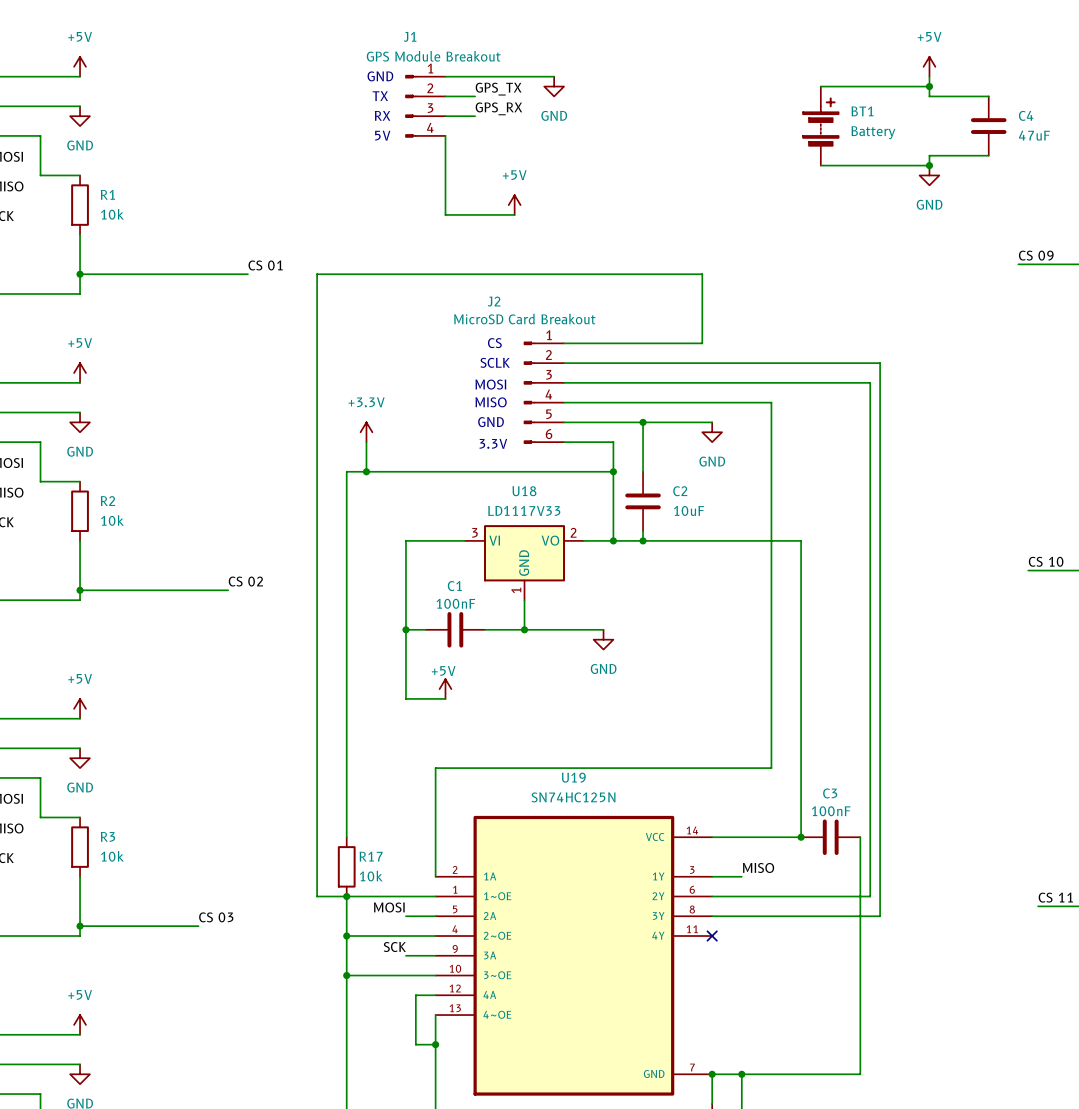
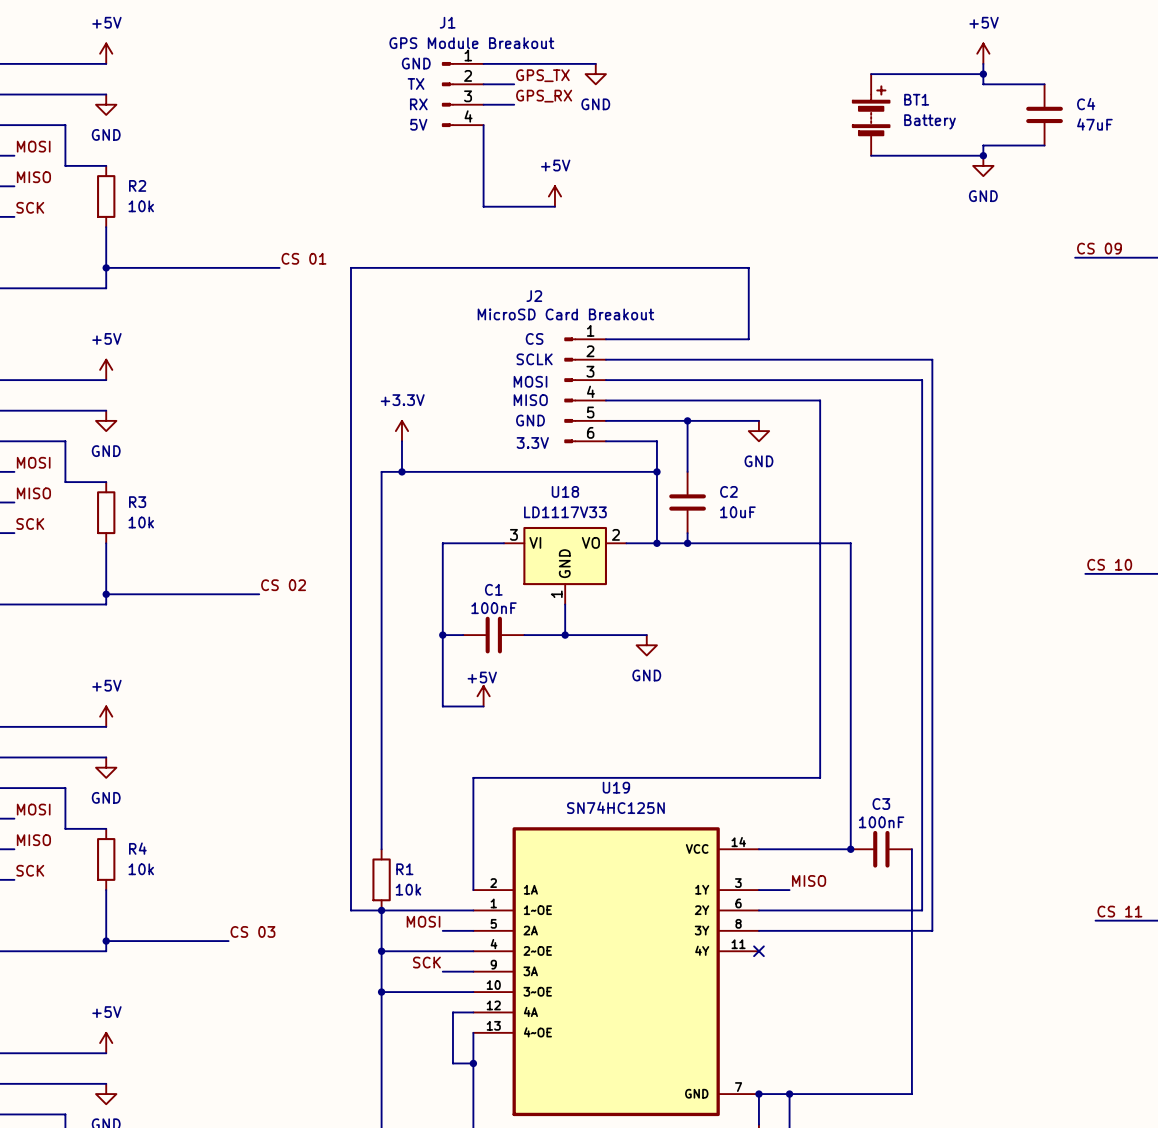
R1 name: R1 (107, 194) -> R2 (137, 185)
R2 name: R2 (107, 501) -> R3 (137, 502)
R3 name: R3 (107, 836) -> R4 (137, 848)
R17 name: R17 (371, 856) -> R1 (404, 869)

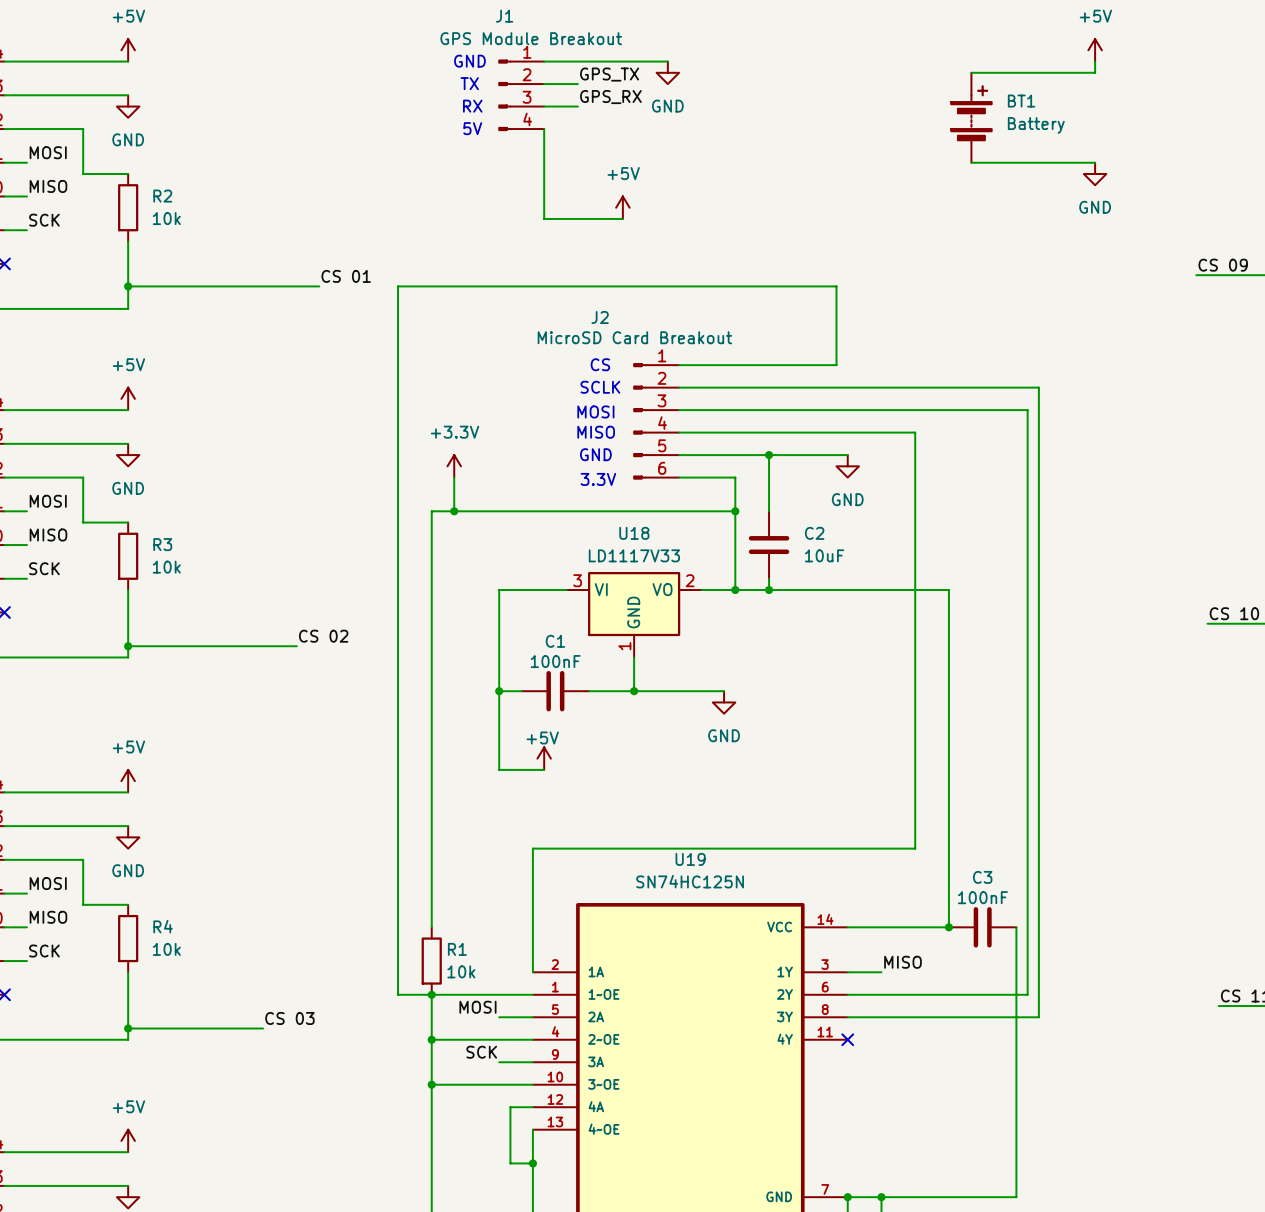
wire: (983, 74) (983, 84) (1044, 84) -> none
junction: (983, 74) -> none
C4: 47uF (1044, 114) -> none
wire: (1044, 145) (983, 145) (983, 155) -> none
junction: (983, 155) -> none

